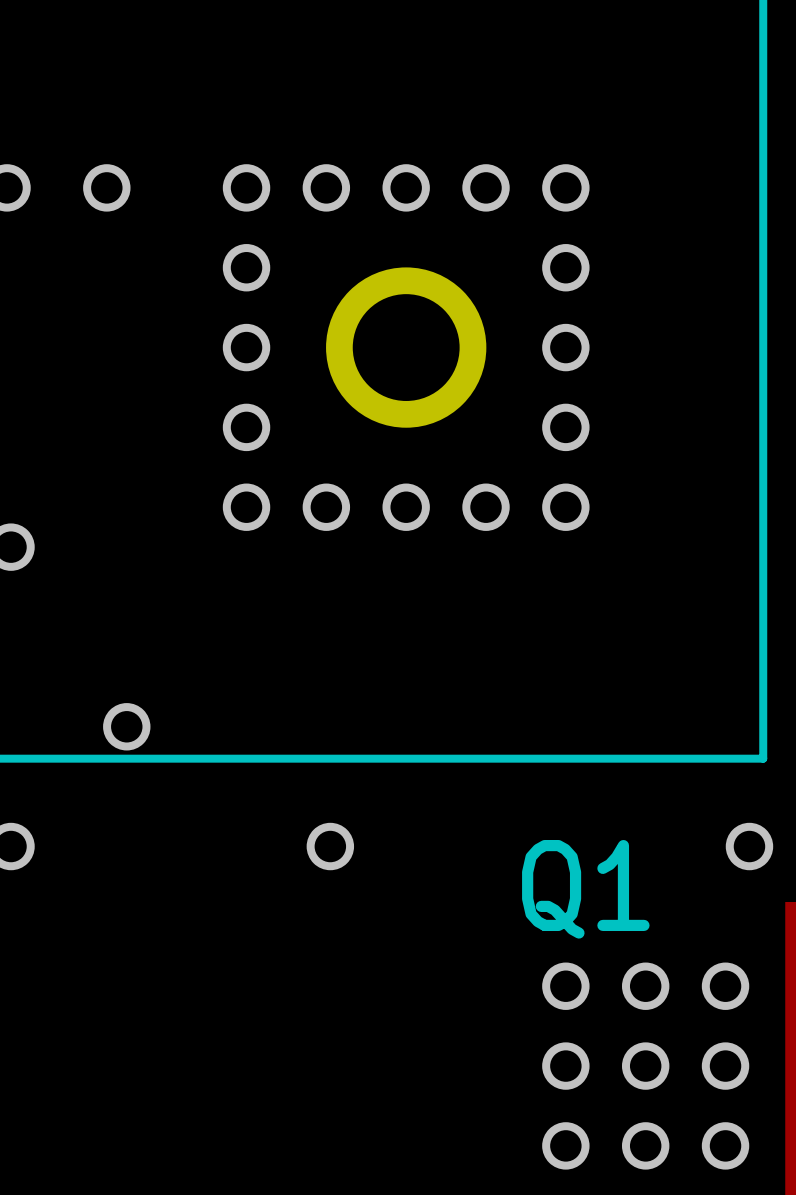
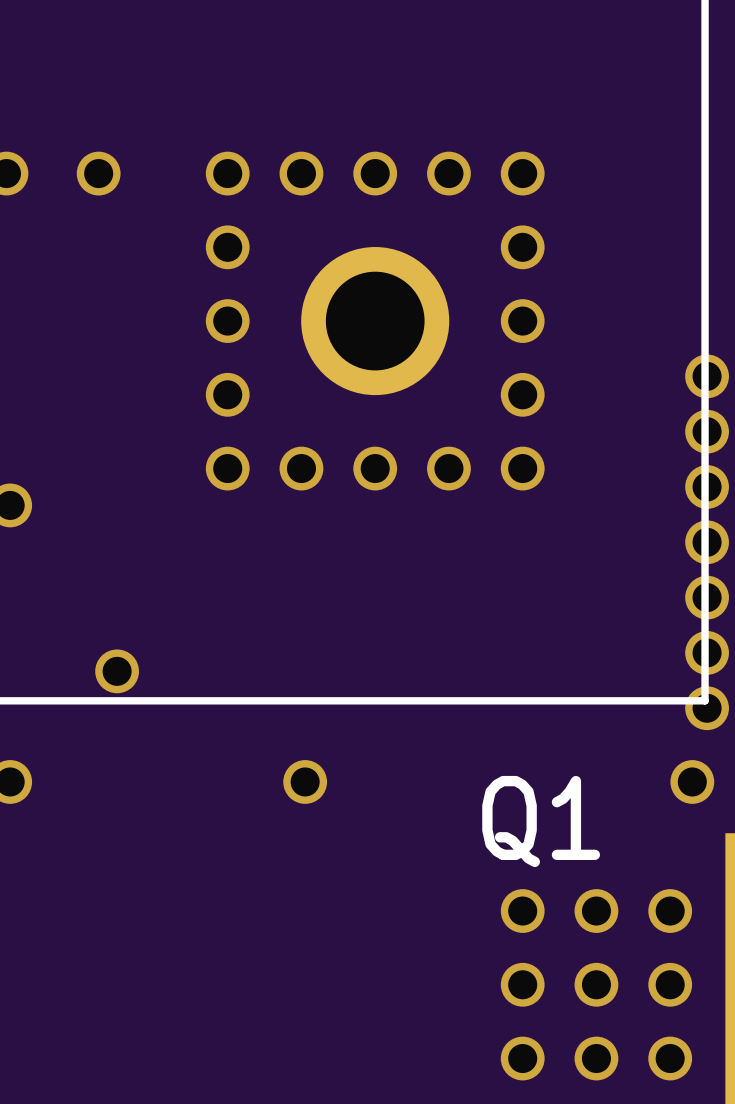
via: none -> (707, 376)
via: none -> (707, 431)
via: none -> (707, 486)
via: none -> (707, 542)
via: none -> (707, 597)
via: none -> (707, 652)
via: none -> (707, 708)

